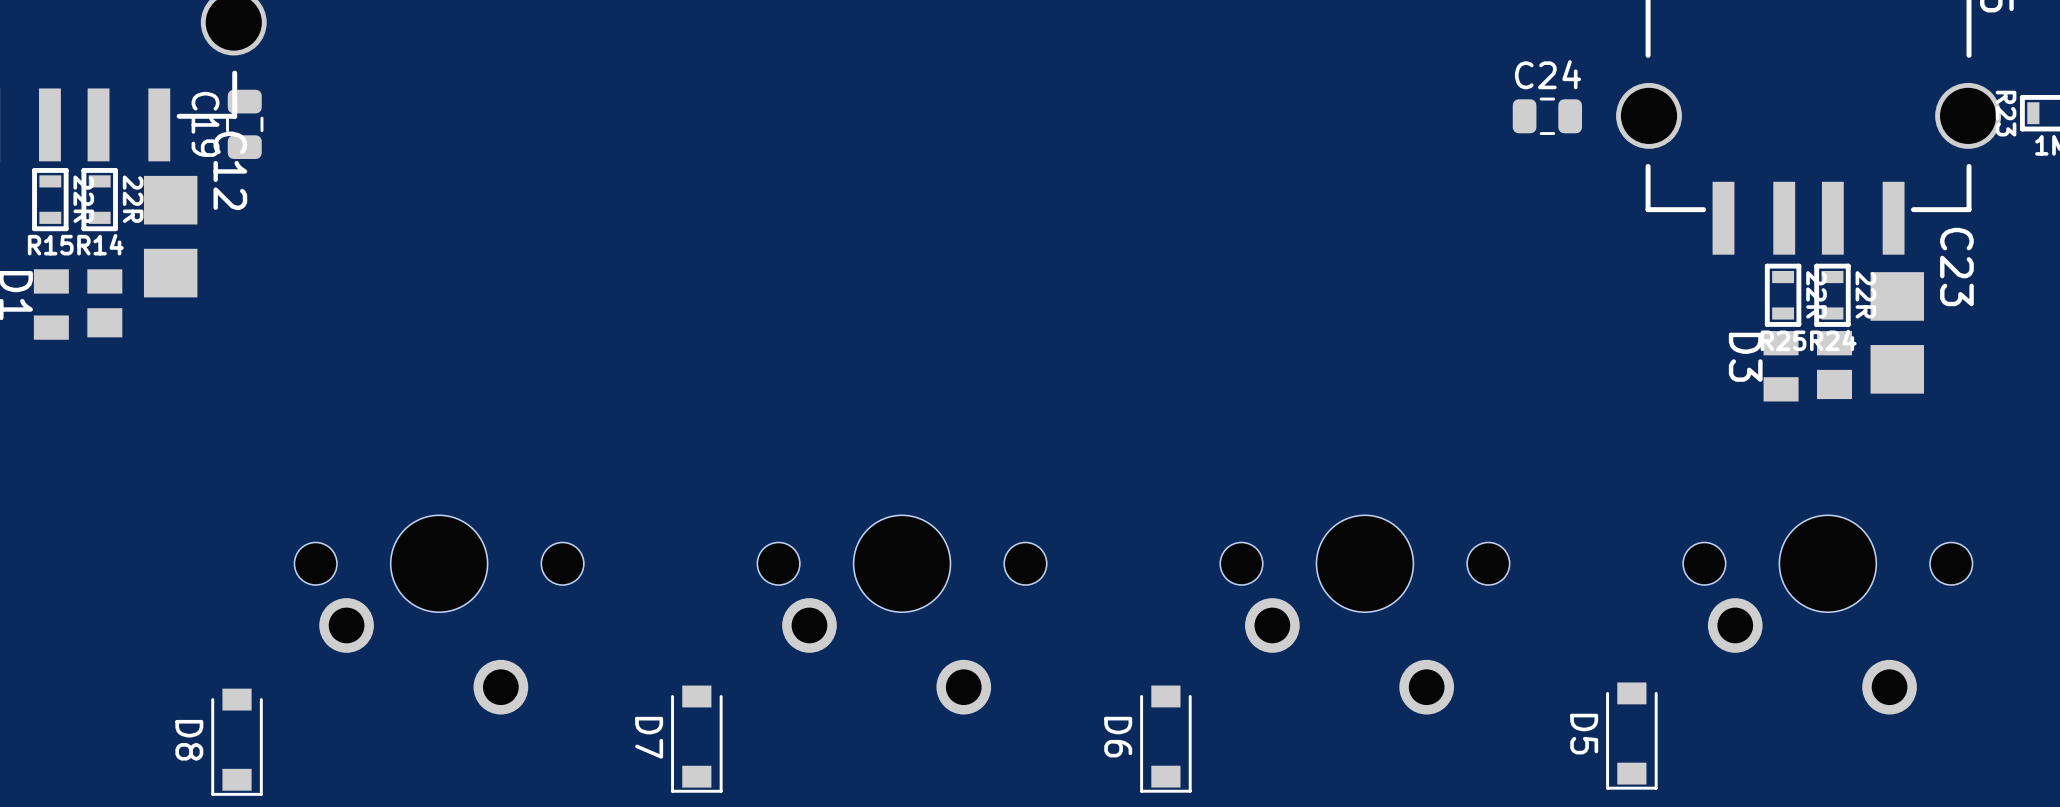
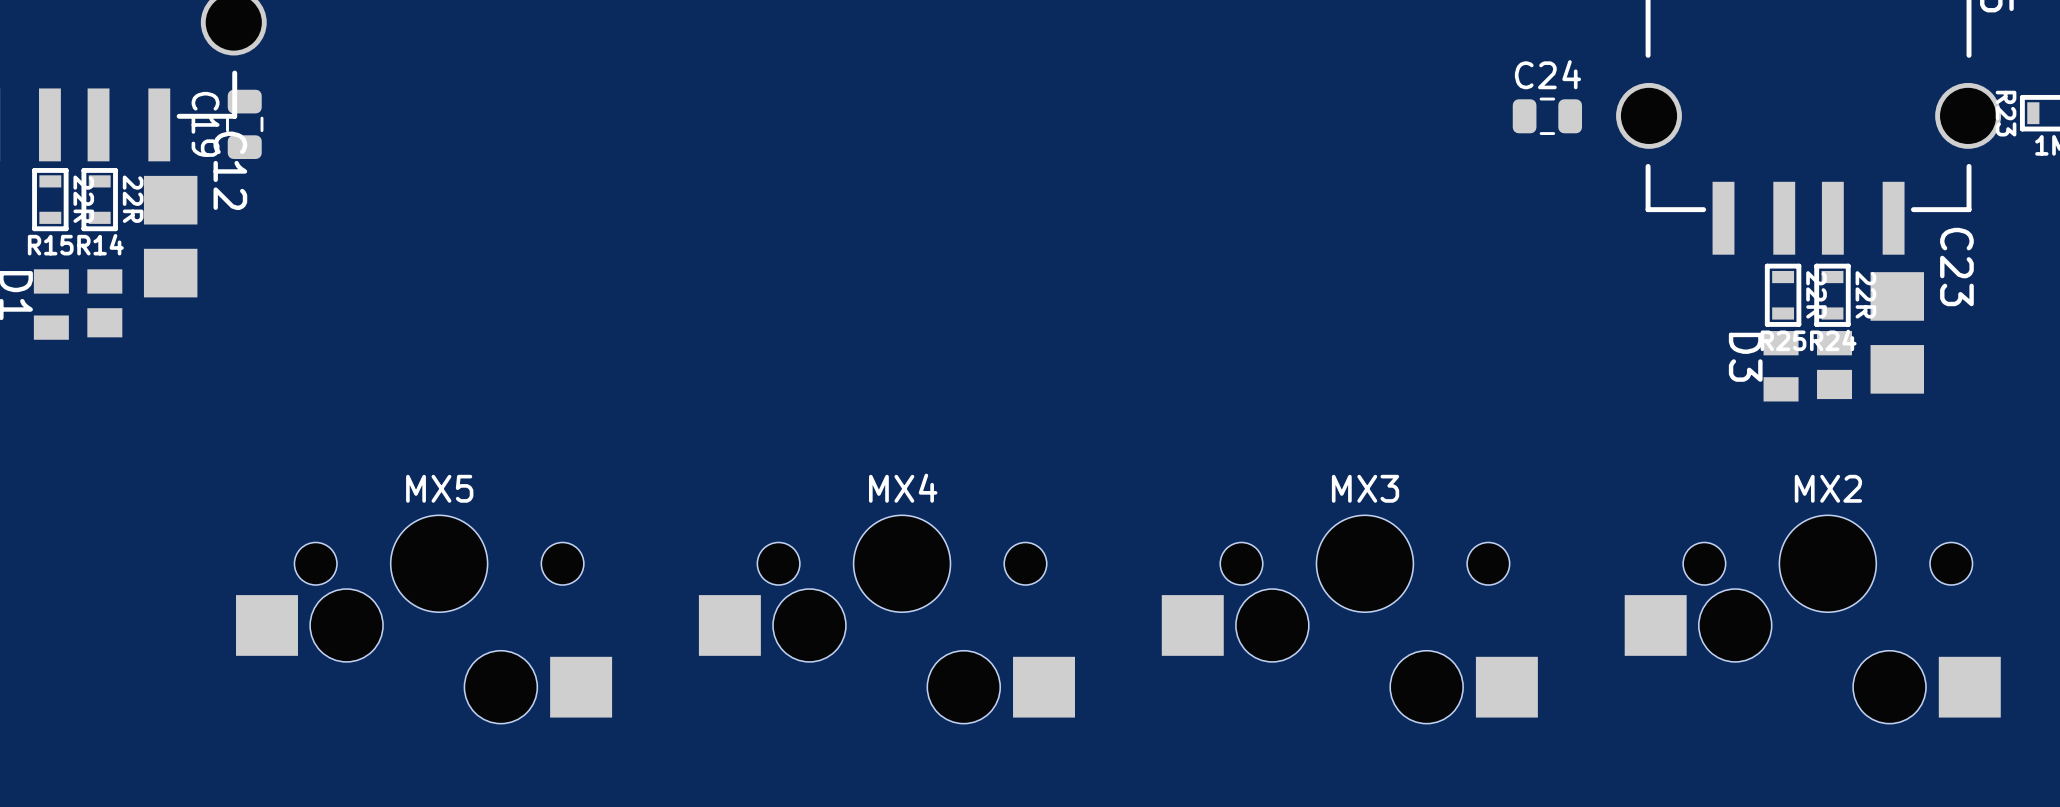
part: (439, 614) -> none
part: (902, 614) -> none
part: (1364, 614) -> none
part: (1827, 614) -> none
MX5: none -> (424, 619)
MX4: none -> (886, 619)
MX3: none -> (1349, 619)
MX2: none -> (1812, 619)
D5: (1631, 736) -> none
D7: (696, 739) -> none
D6: (1165, 739) -> none
D8: (237, 742) -> none

